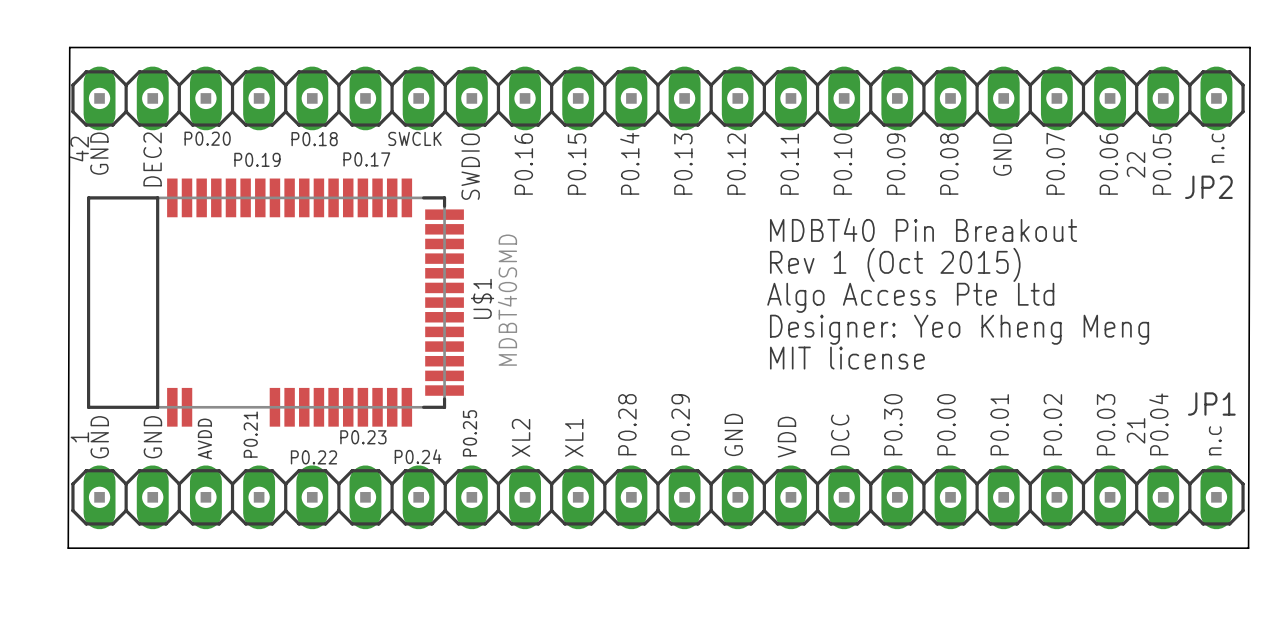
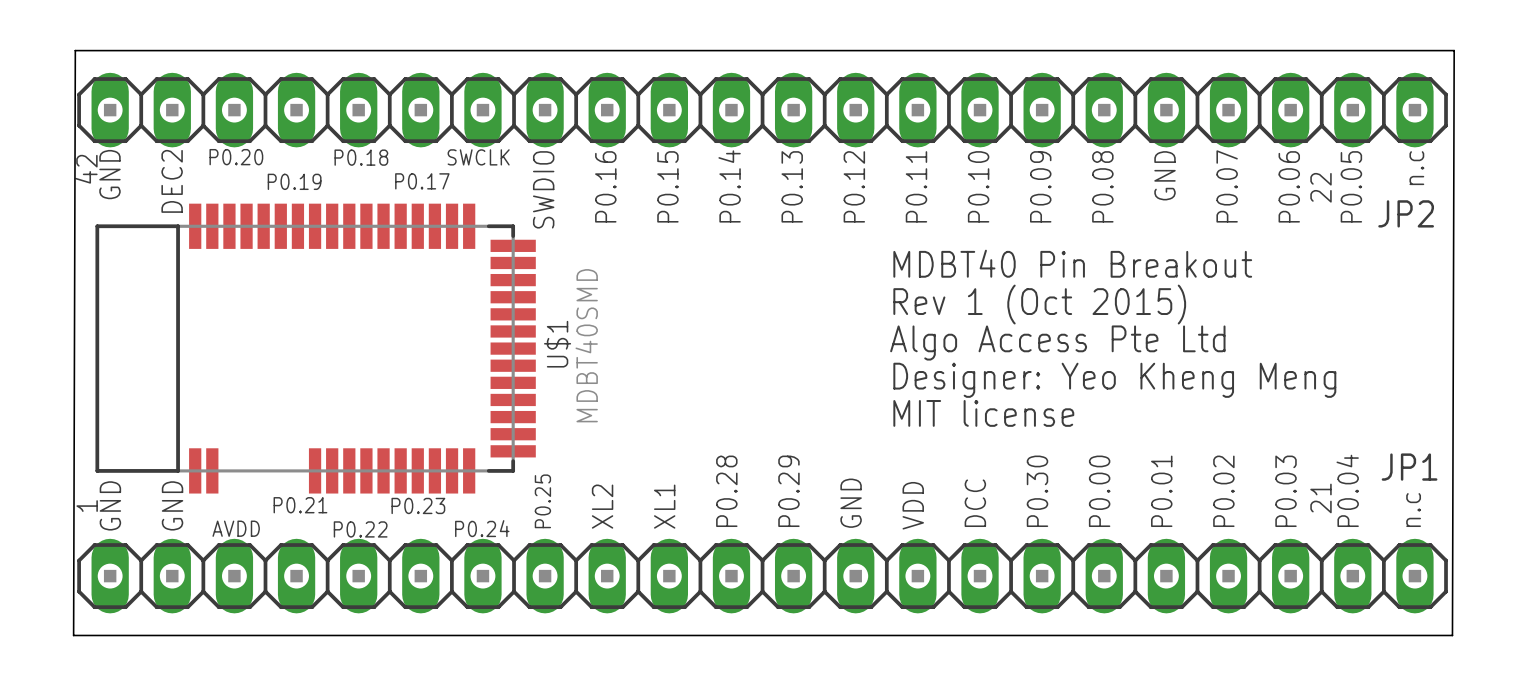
text rotation: 0° (250, 434) -> 90° clockwise (300, 505)
text rotation: 0° (204, 438) -> 90° clockwise (236, 528)

